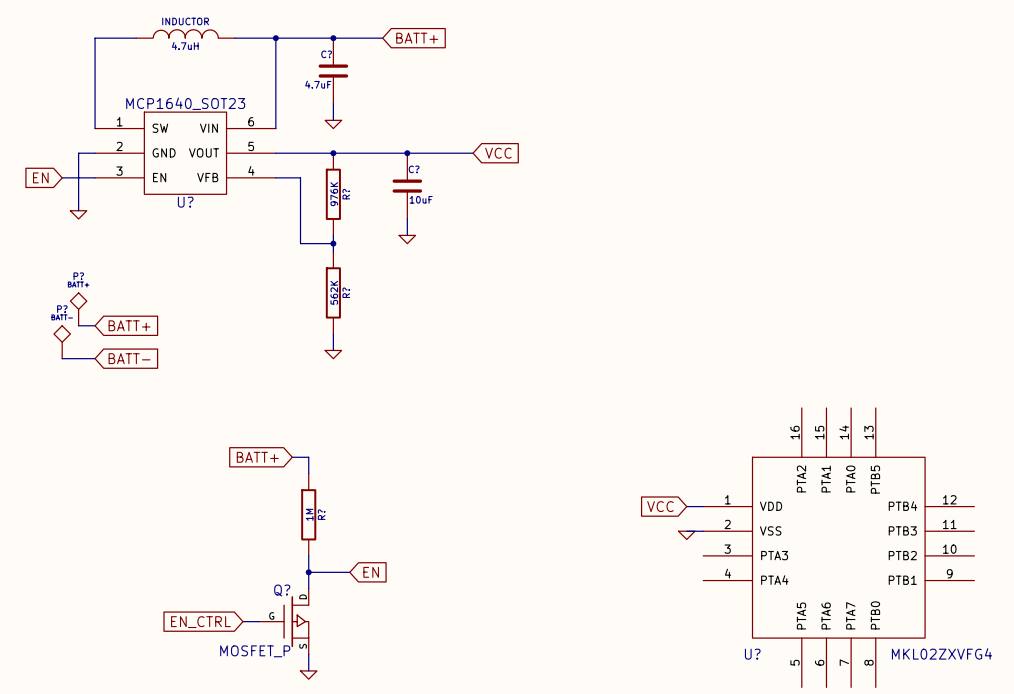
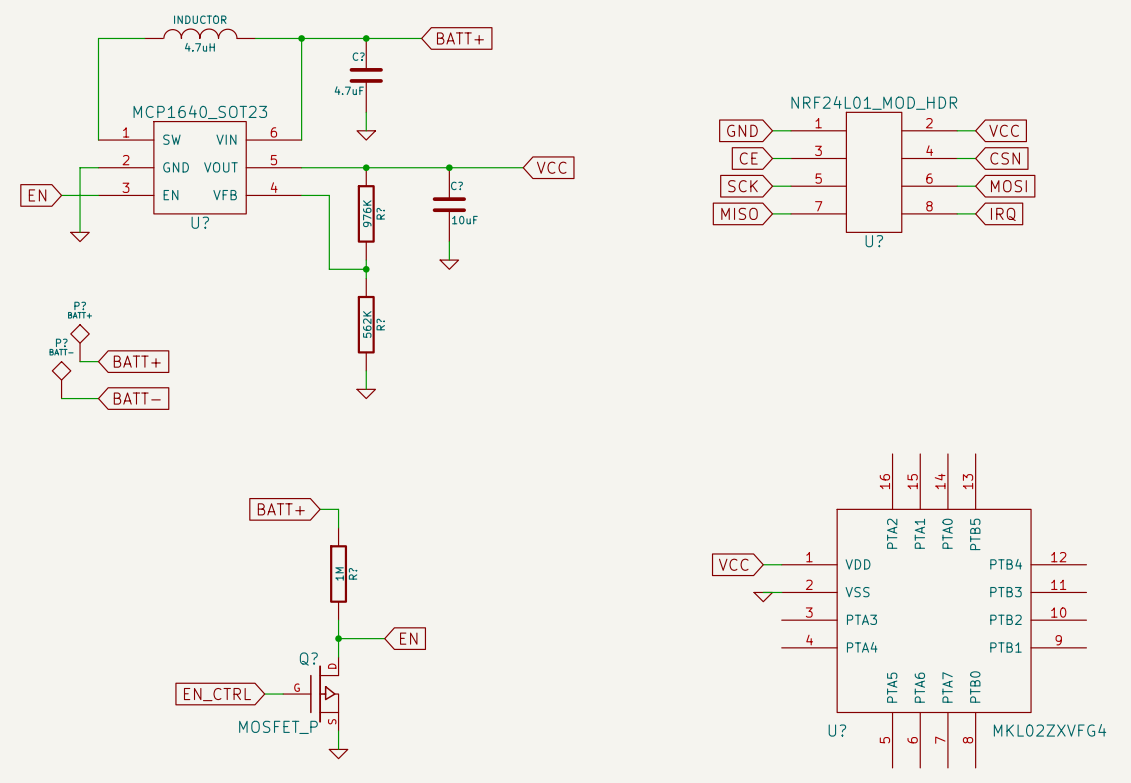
global label: none -> GND (742, 130)
wire: none -> (772, 130) (790, 130)
wire: none -> (957, 130) (975, 130)
global label: none -> VCC (1004, 130)
global label: none -> CE (748, 158)
wire: none -> (772, 158) (790, 158)
wire: none -> (957, 158) (975, 158)
global label: none -> CSN (1005, 158)
U?: none -> NRF24L01_MOD_HDR (874, 172)
global label: none -> SCK (742, 186)
wire: none -> (772, 186) (790, 186)
wire: none -> (957, 186) (975, 186)
global label: none -> MOSI (1008, 186)
global label: none -> MISO (739, 213)
wire: none -> (772, 213) (790, 213)
wire: none -> (957, 213) (975, 213)
global label: none -> IRQ (1003, 214)

